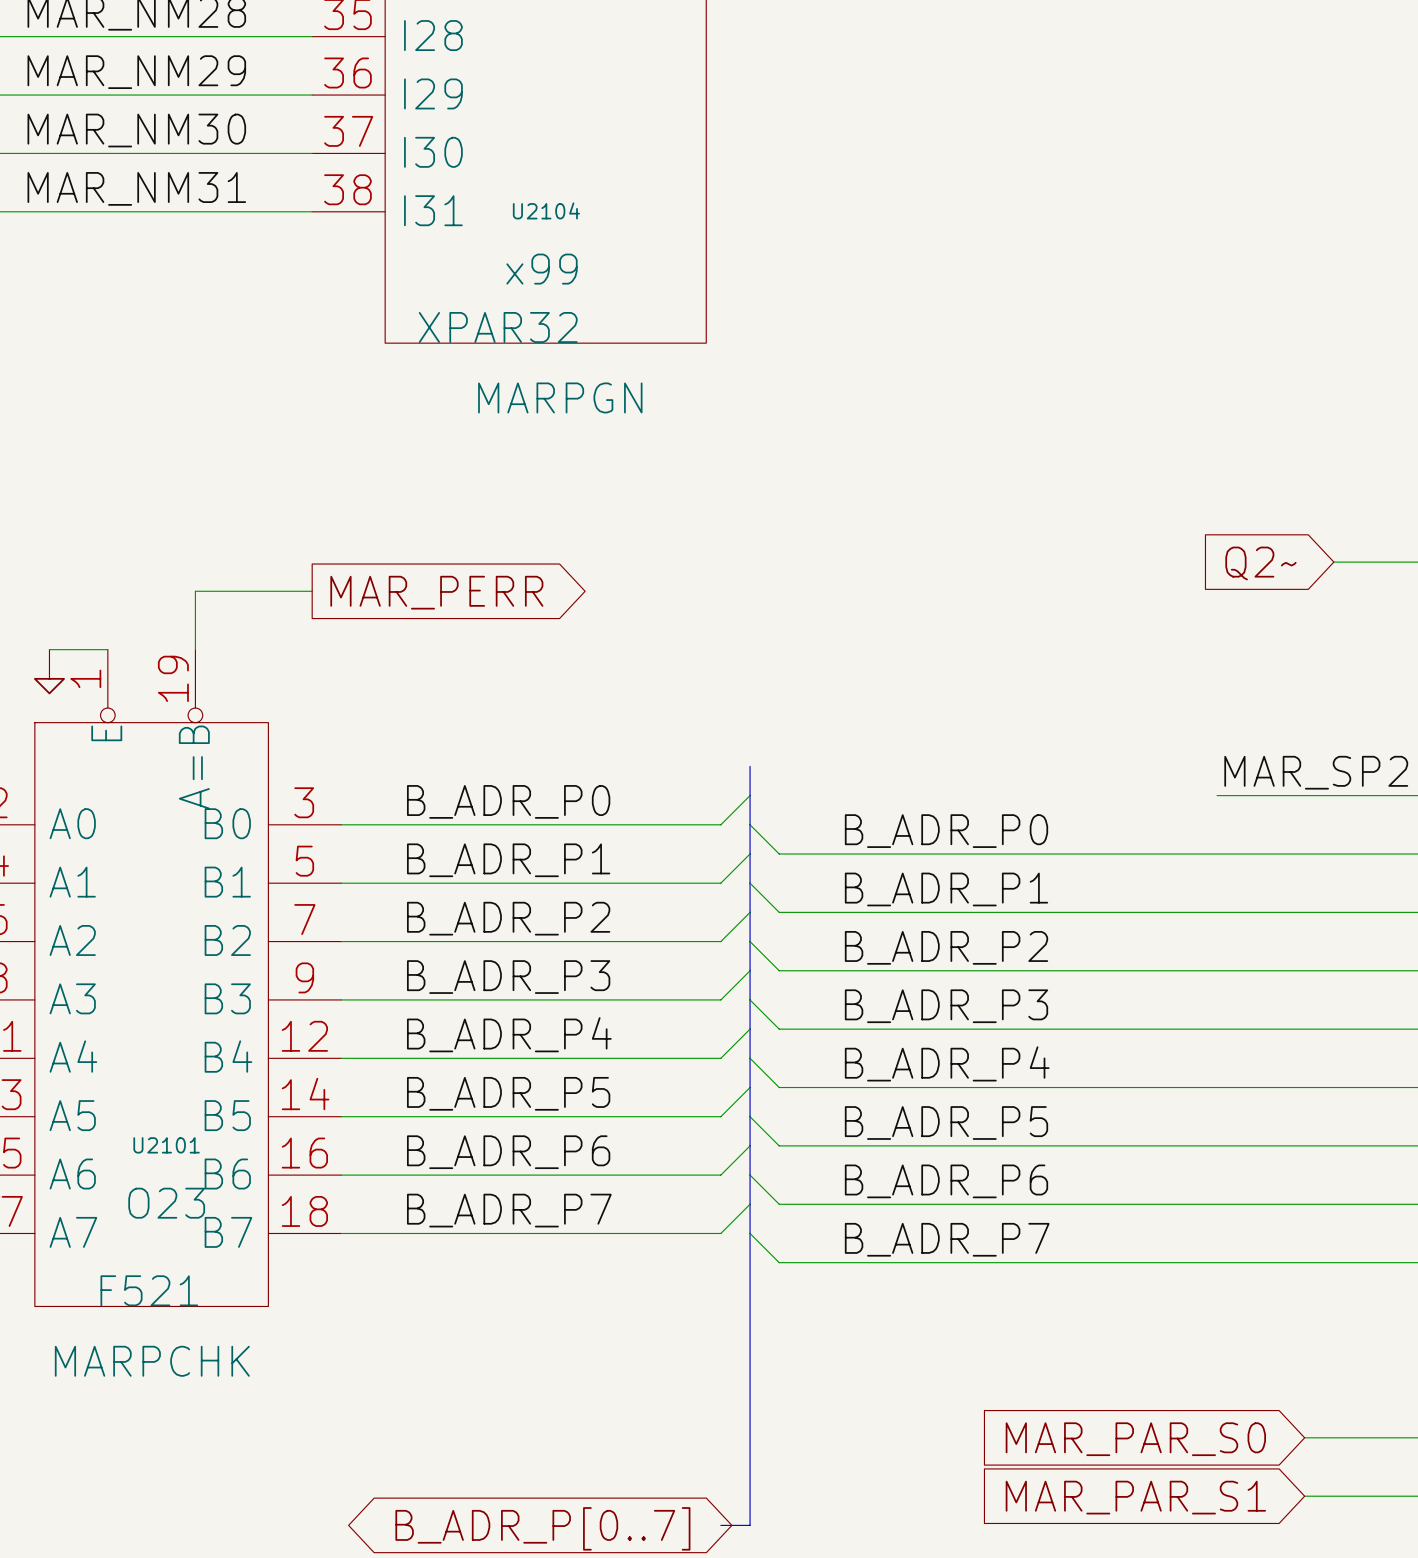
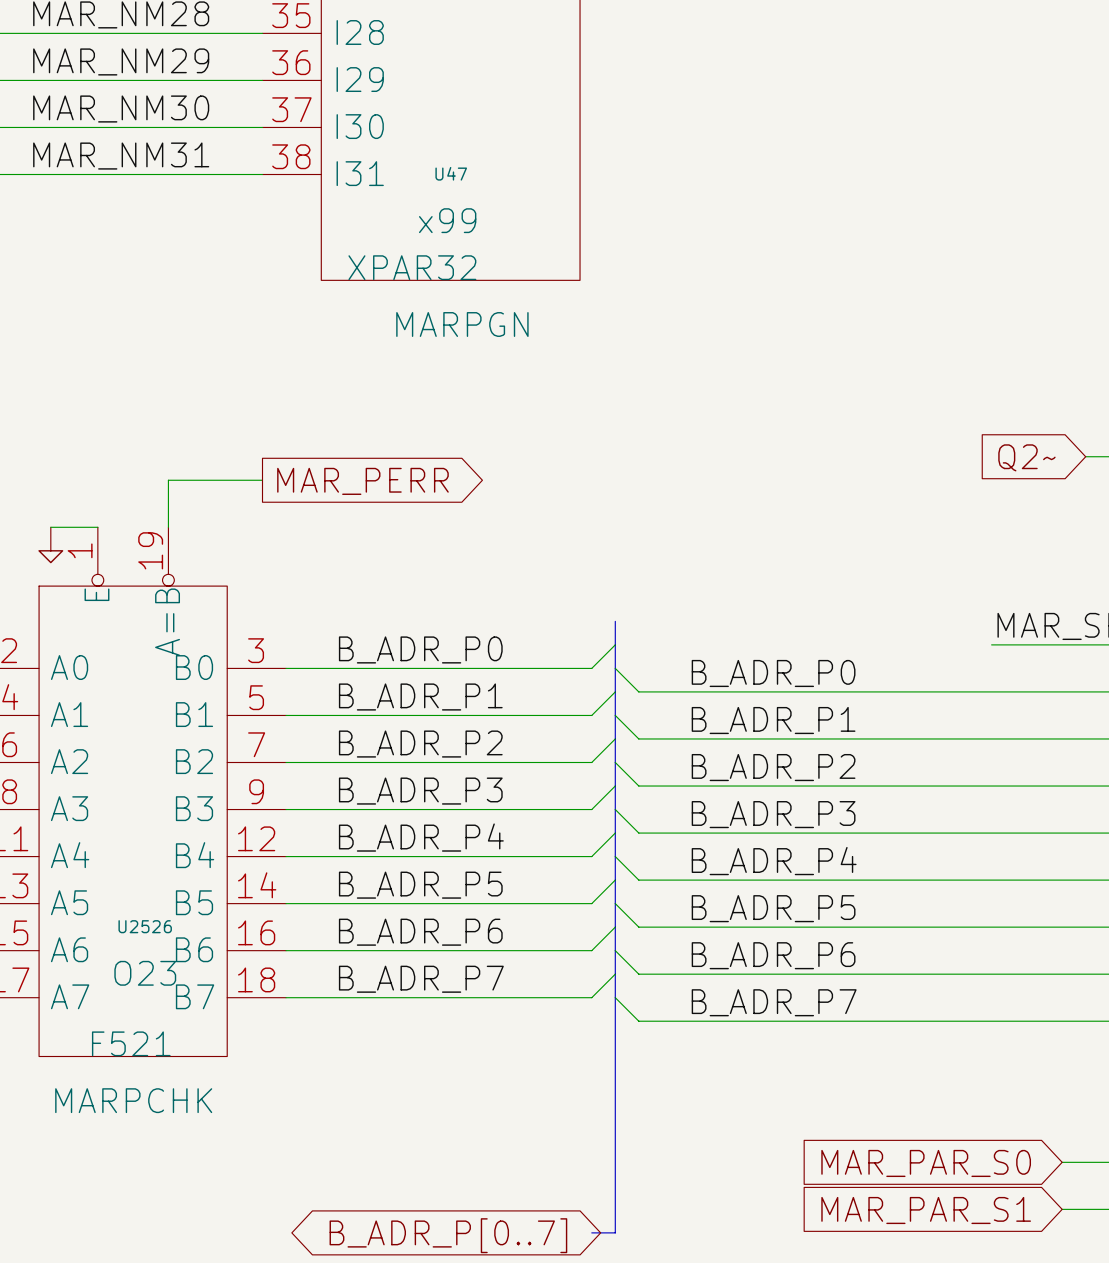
U2104 name: U2104 (546, 210) -> U47 (451, 173)
U2101 name: U2101 (166, 1145) -> U2526 (145, 926)

